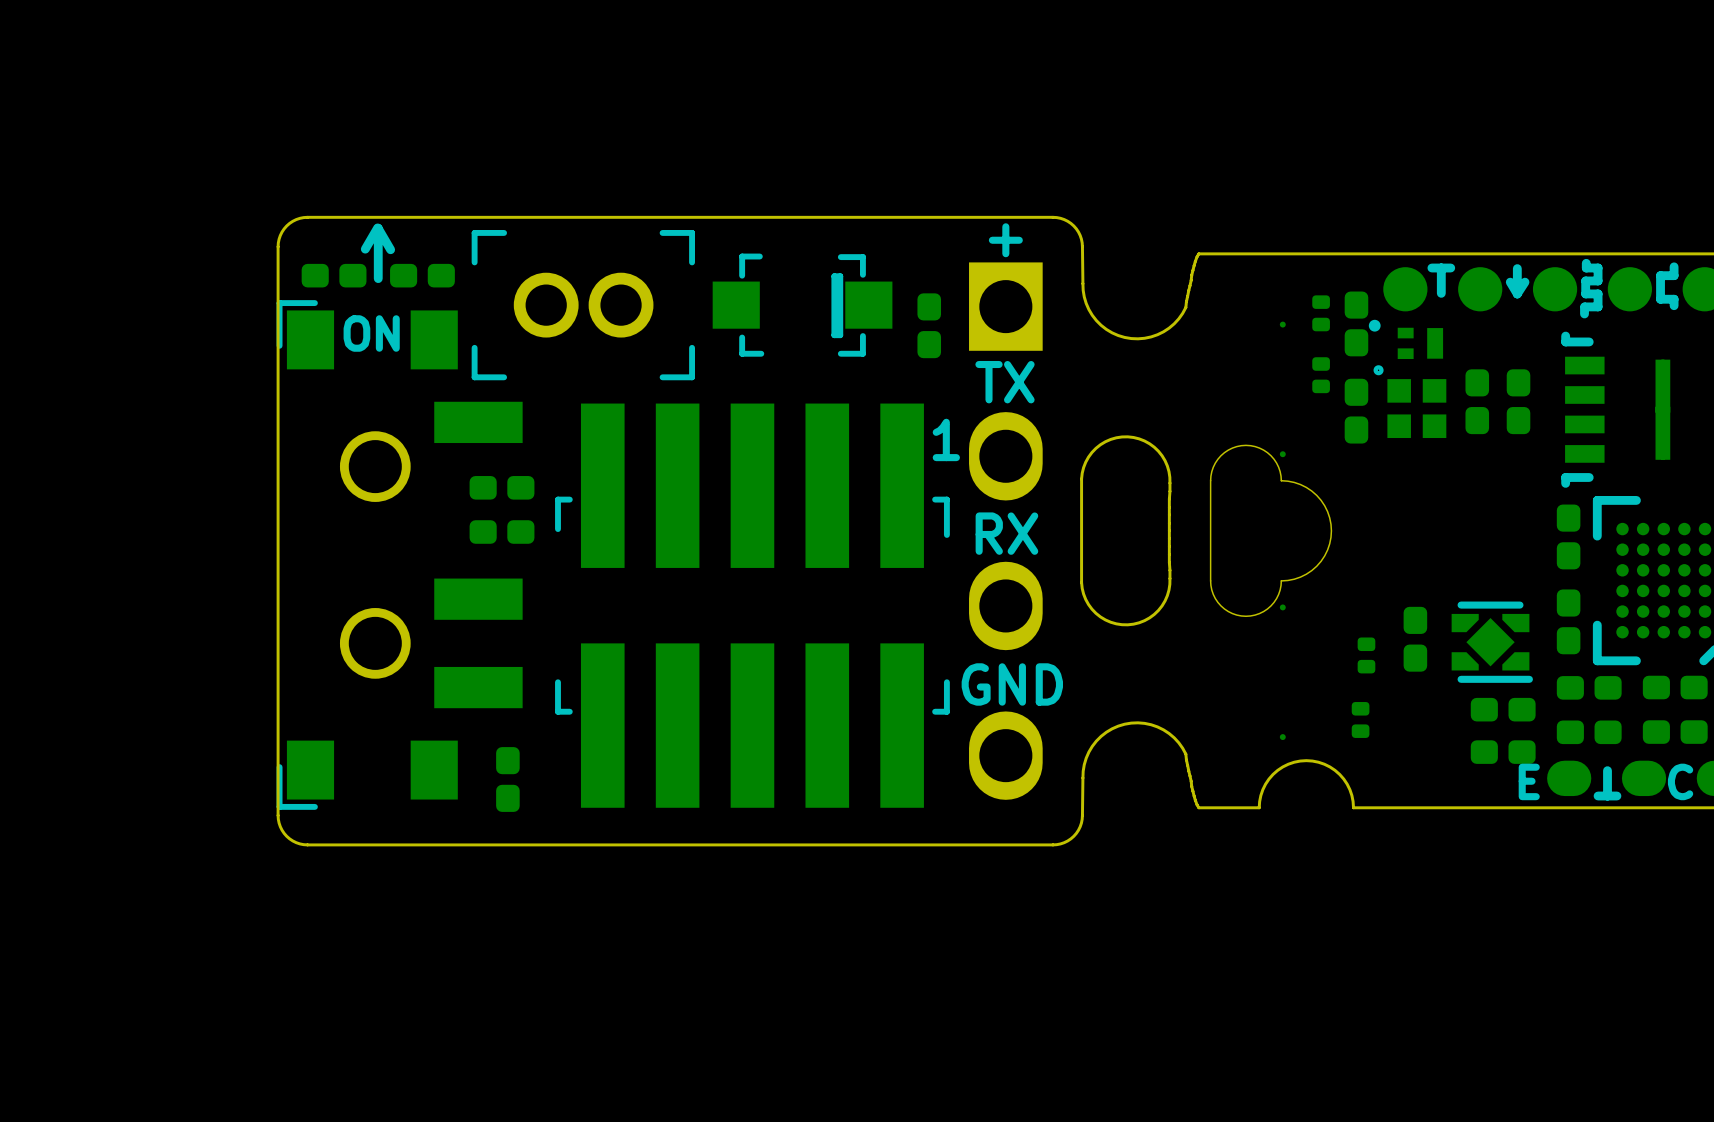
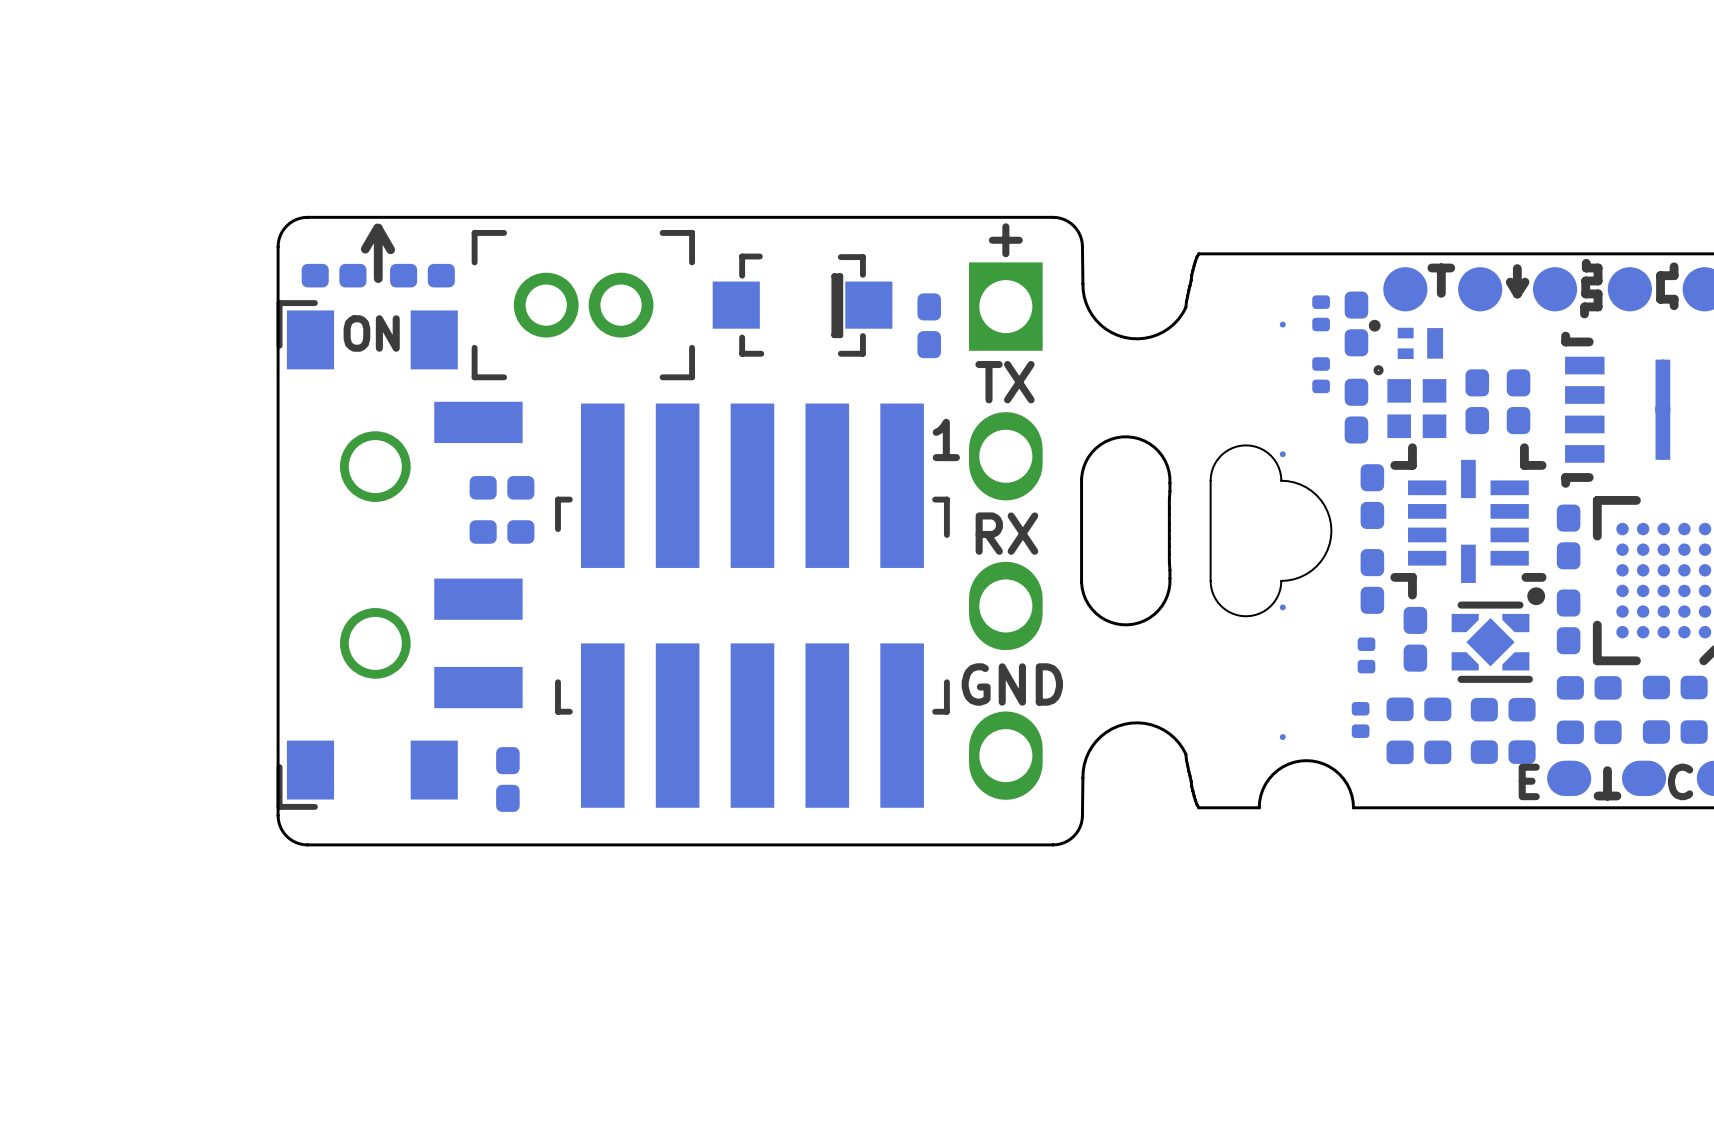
part: none -> (1372, 496)
part: none -> (1468, 524)
part: none -> (1372, 581)
part: none -> (1418, 709)
part: none -> (1418, 752)

